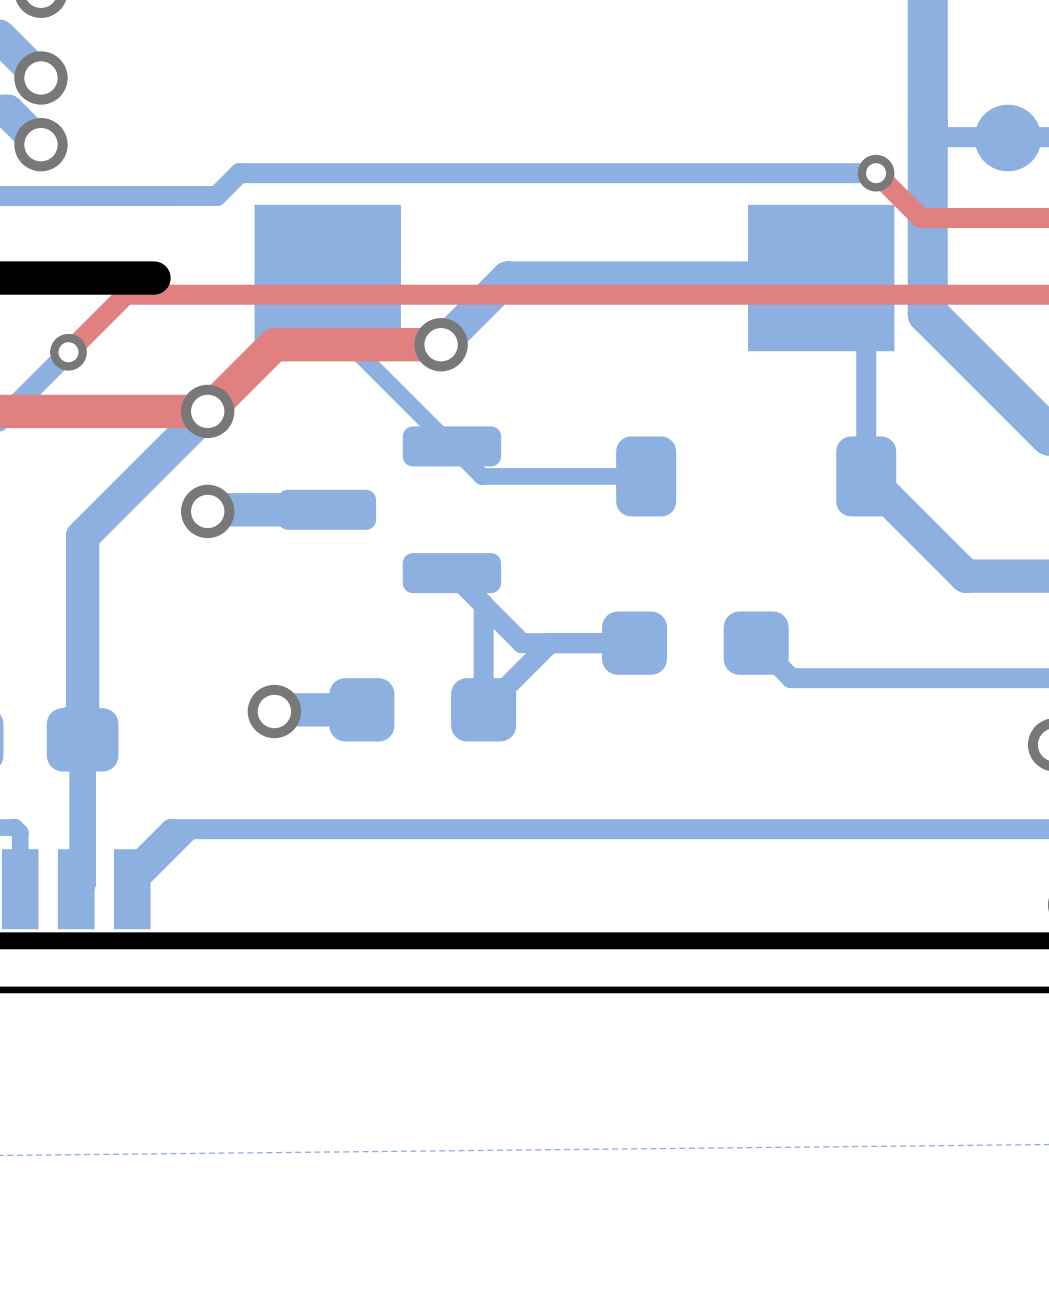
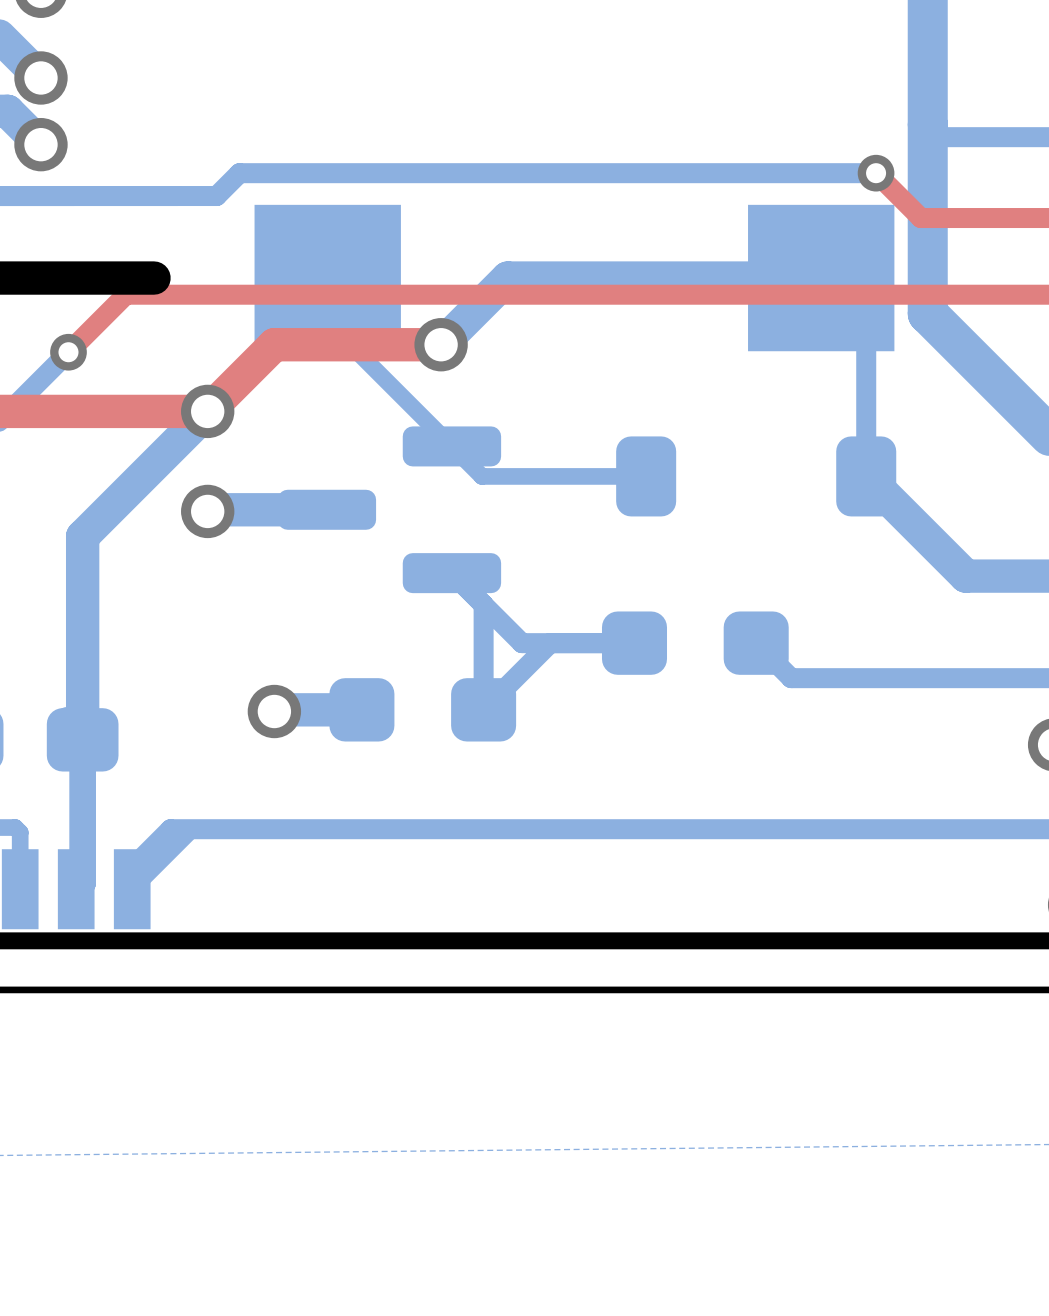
part: (1007, 138) -> none

